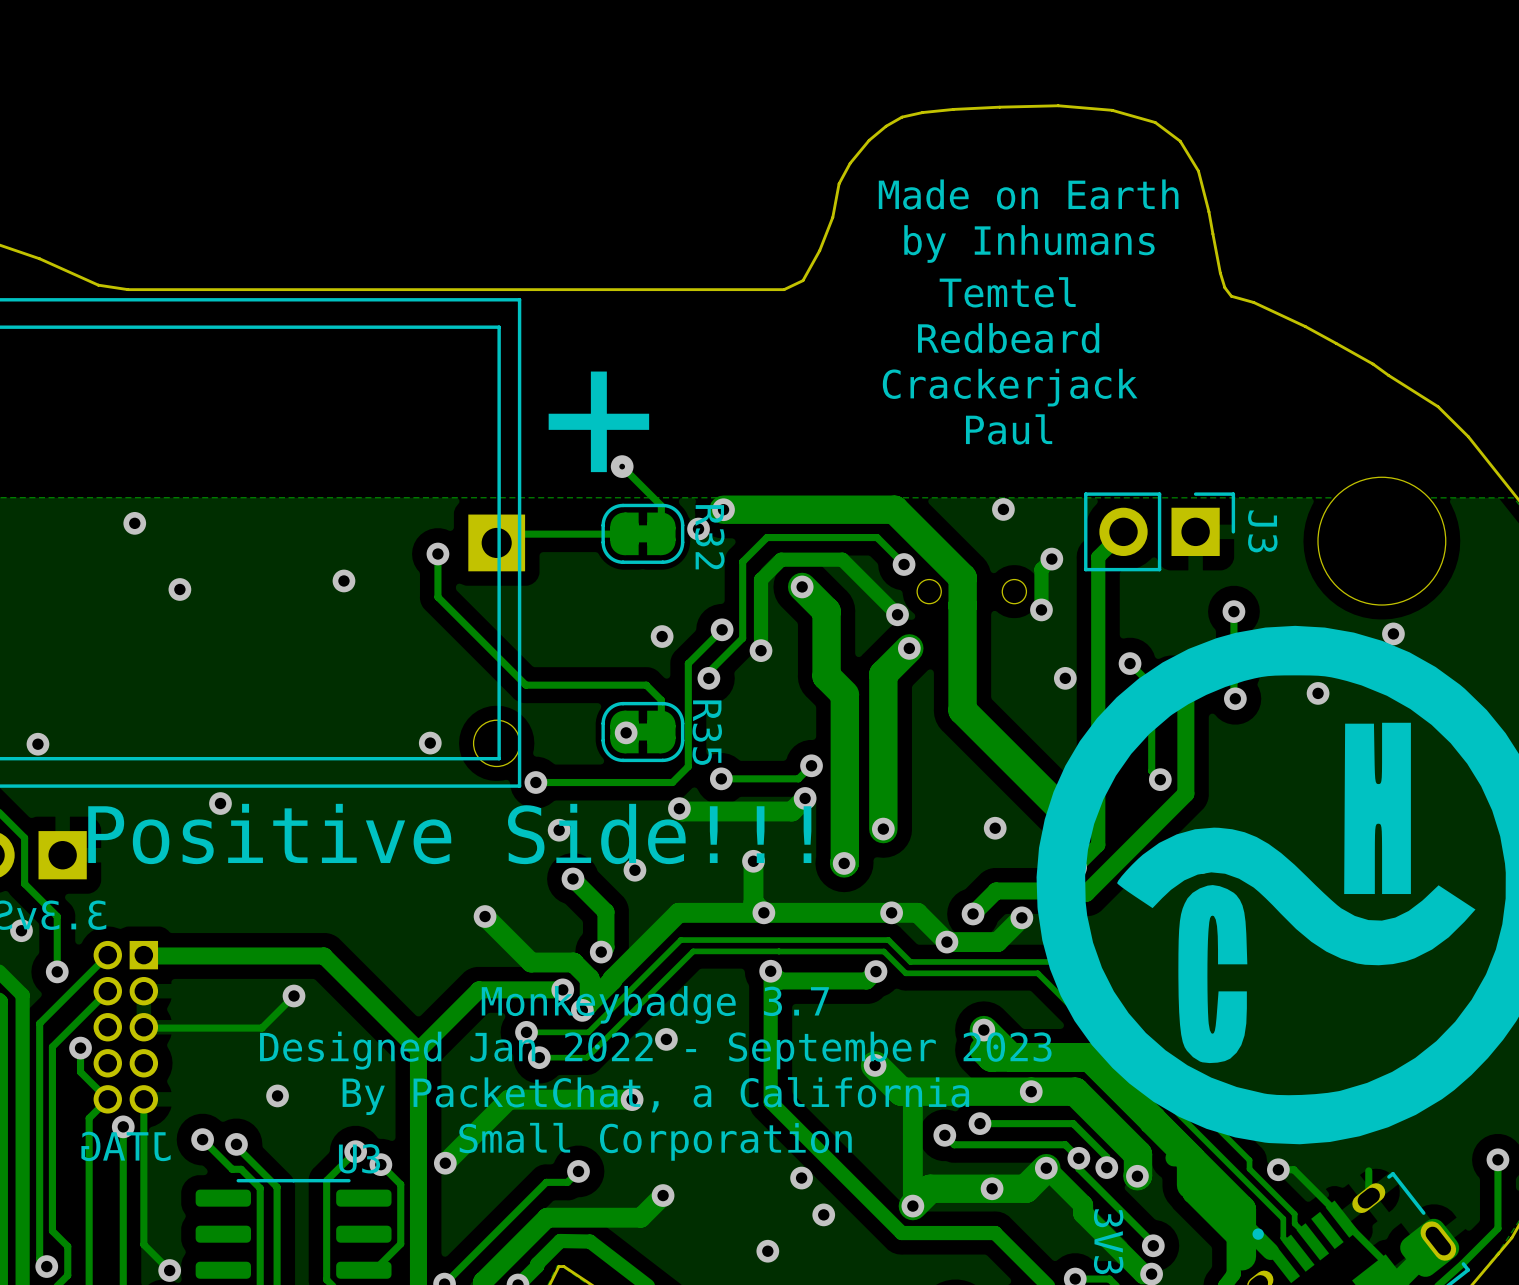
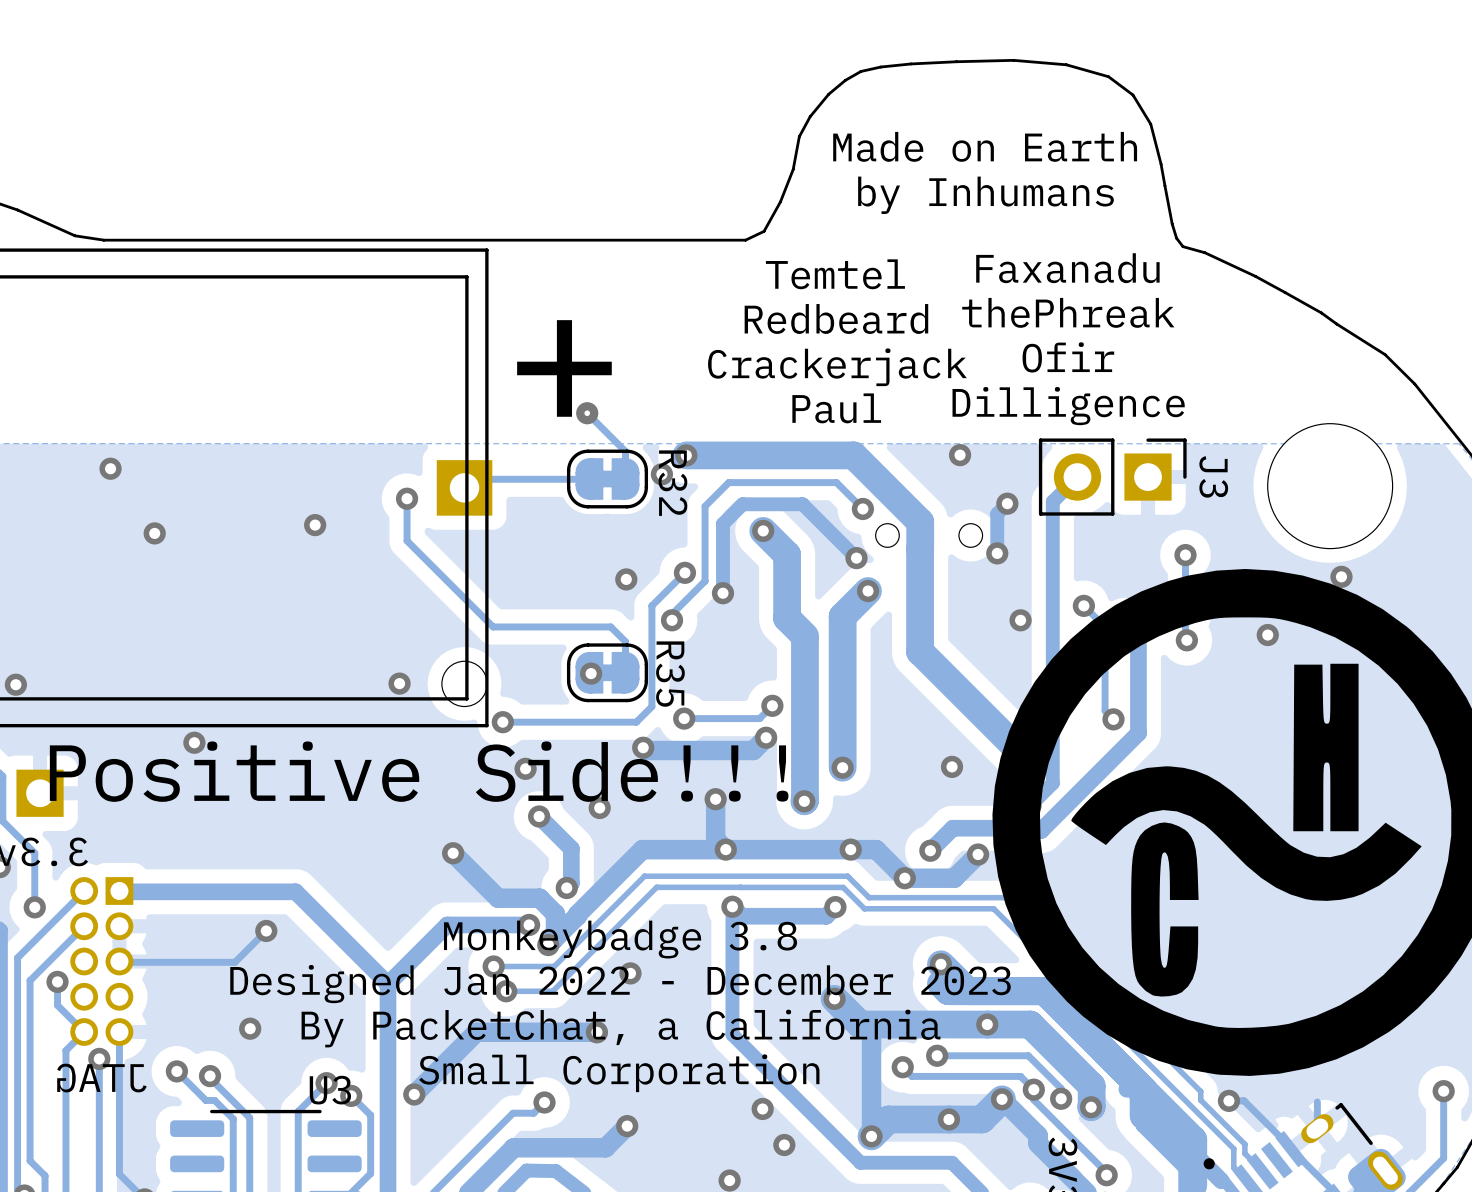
text position: Temtel (1007, 292) -> Temtel (835, 274)
text: none -> Faxanadu (1067, 268)
text position: Redbeard (1008, 338) -> Redbeard (836, 318)
text: none -> thePhreak (1068, 312)
text position: Crackerjack (1010, 387) -> Crackerjack (837, 367)
text: none -> Ofir (1068, 357)
text position: Paul (1009, 429) -> Paul (836, 408)
text: none -> Dilligence (1068, 406)
text: Monkeybadge 3.7 (655, 1004) -> Monkeybadge 3.8 (620, 939)
text: Designed Jan 2022 - September 2023 (655, 1050) -> Designed Jan 2022 - December 2023 (620, 984)

